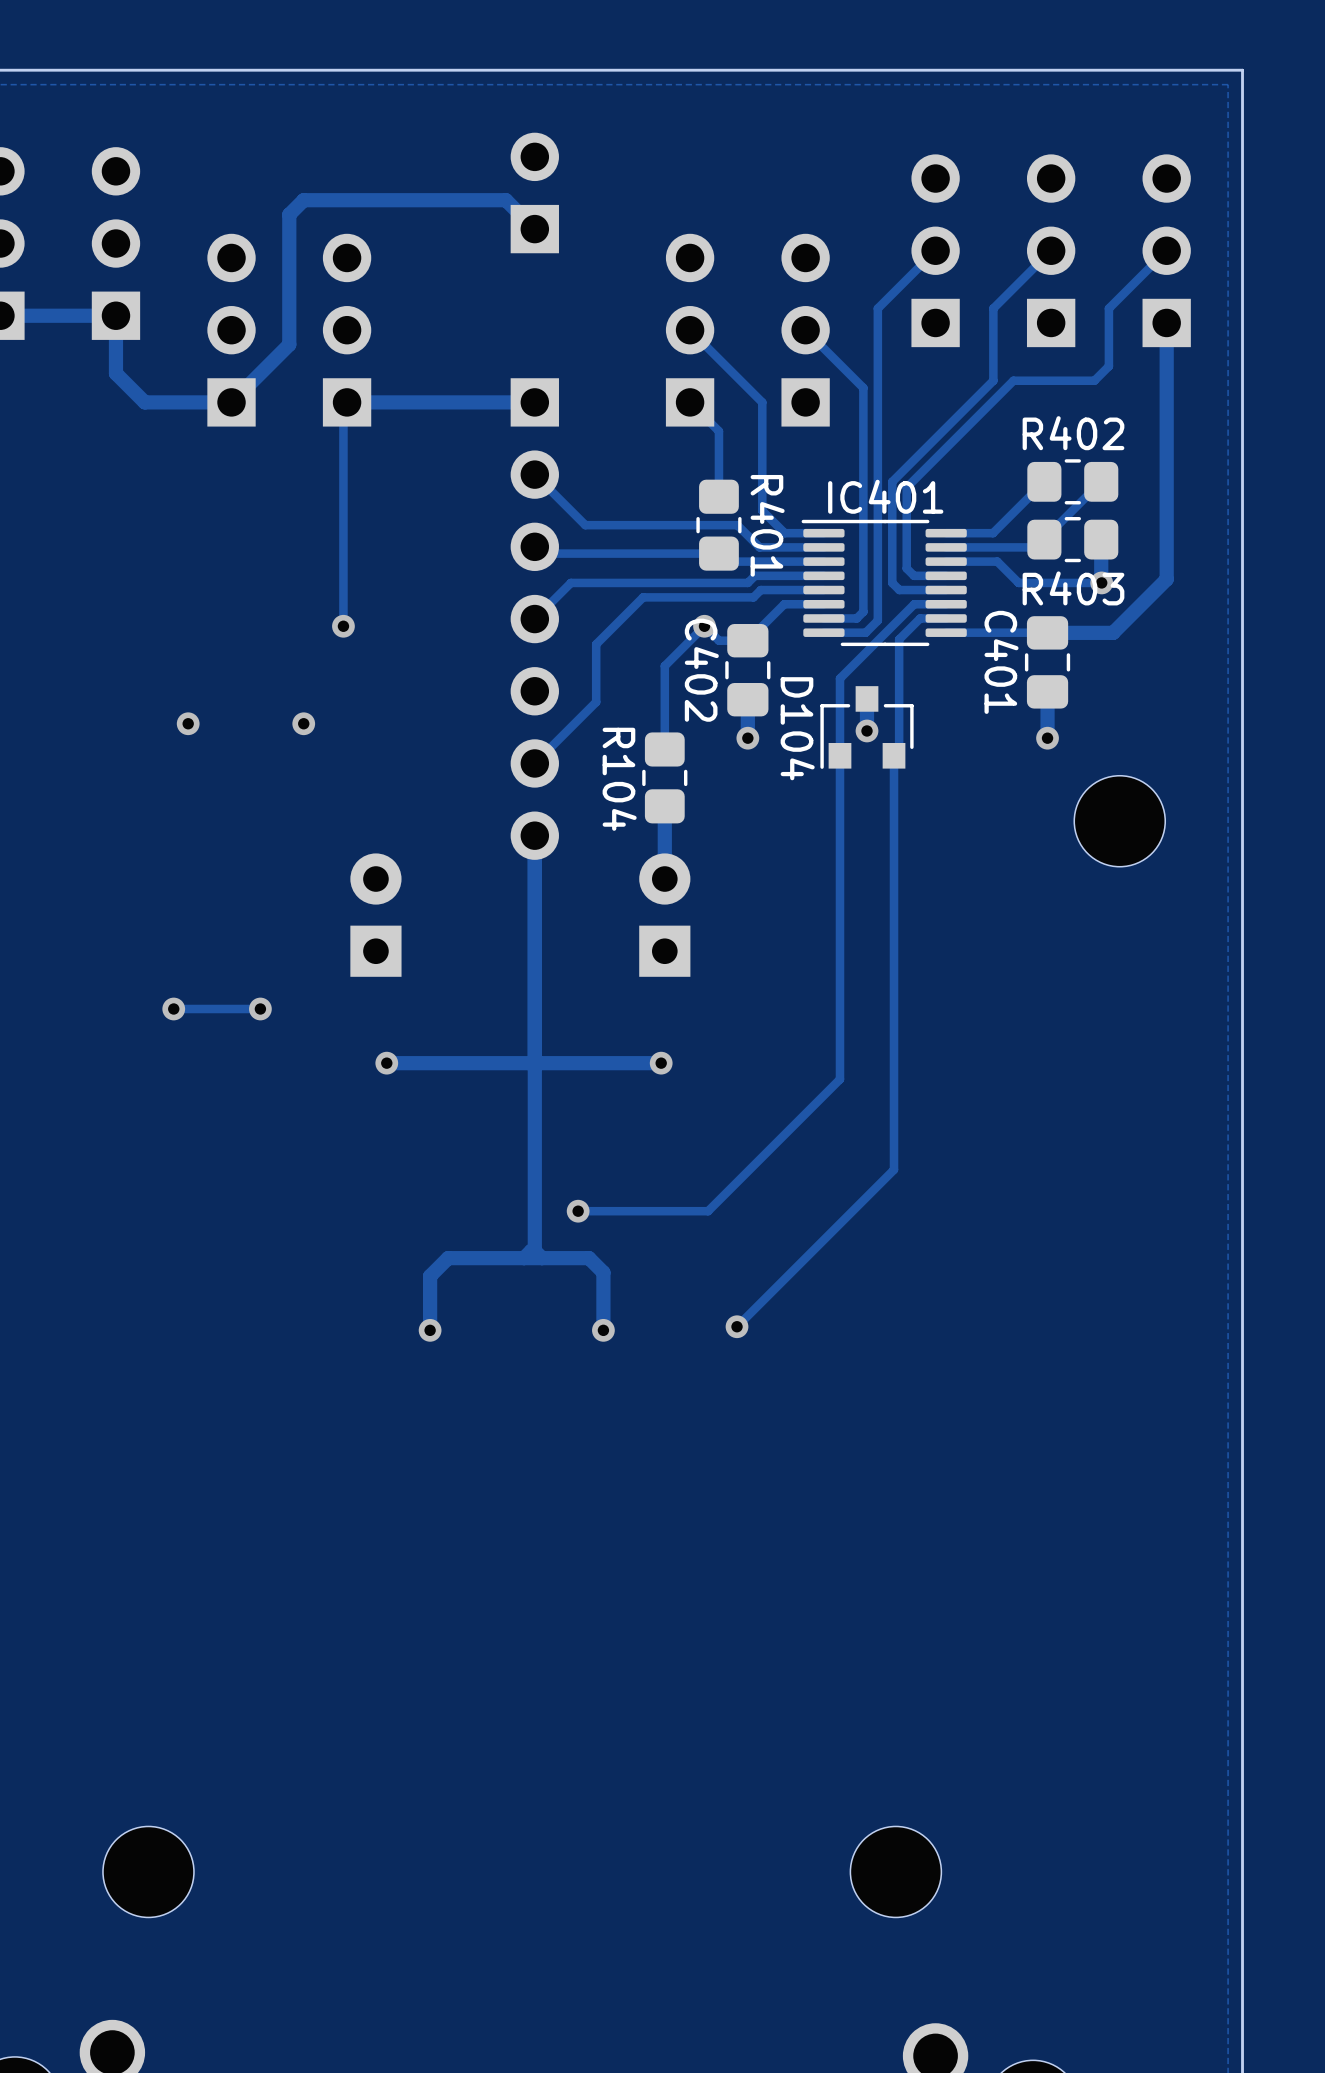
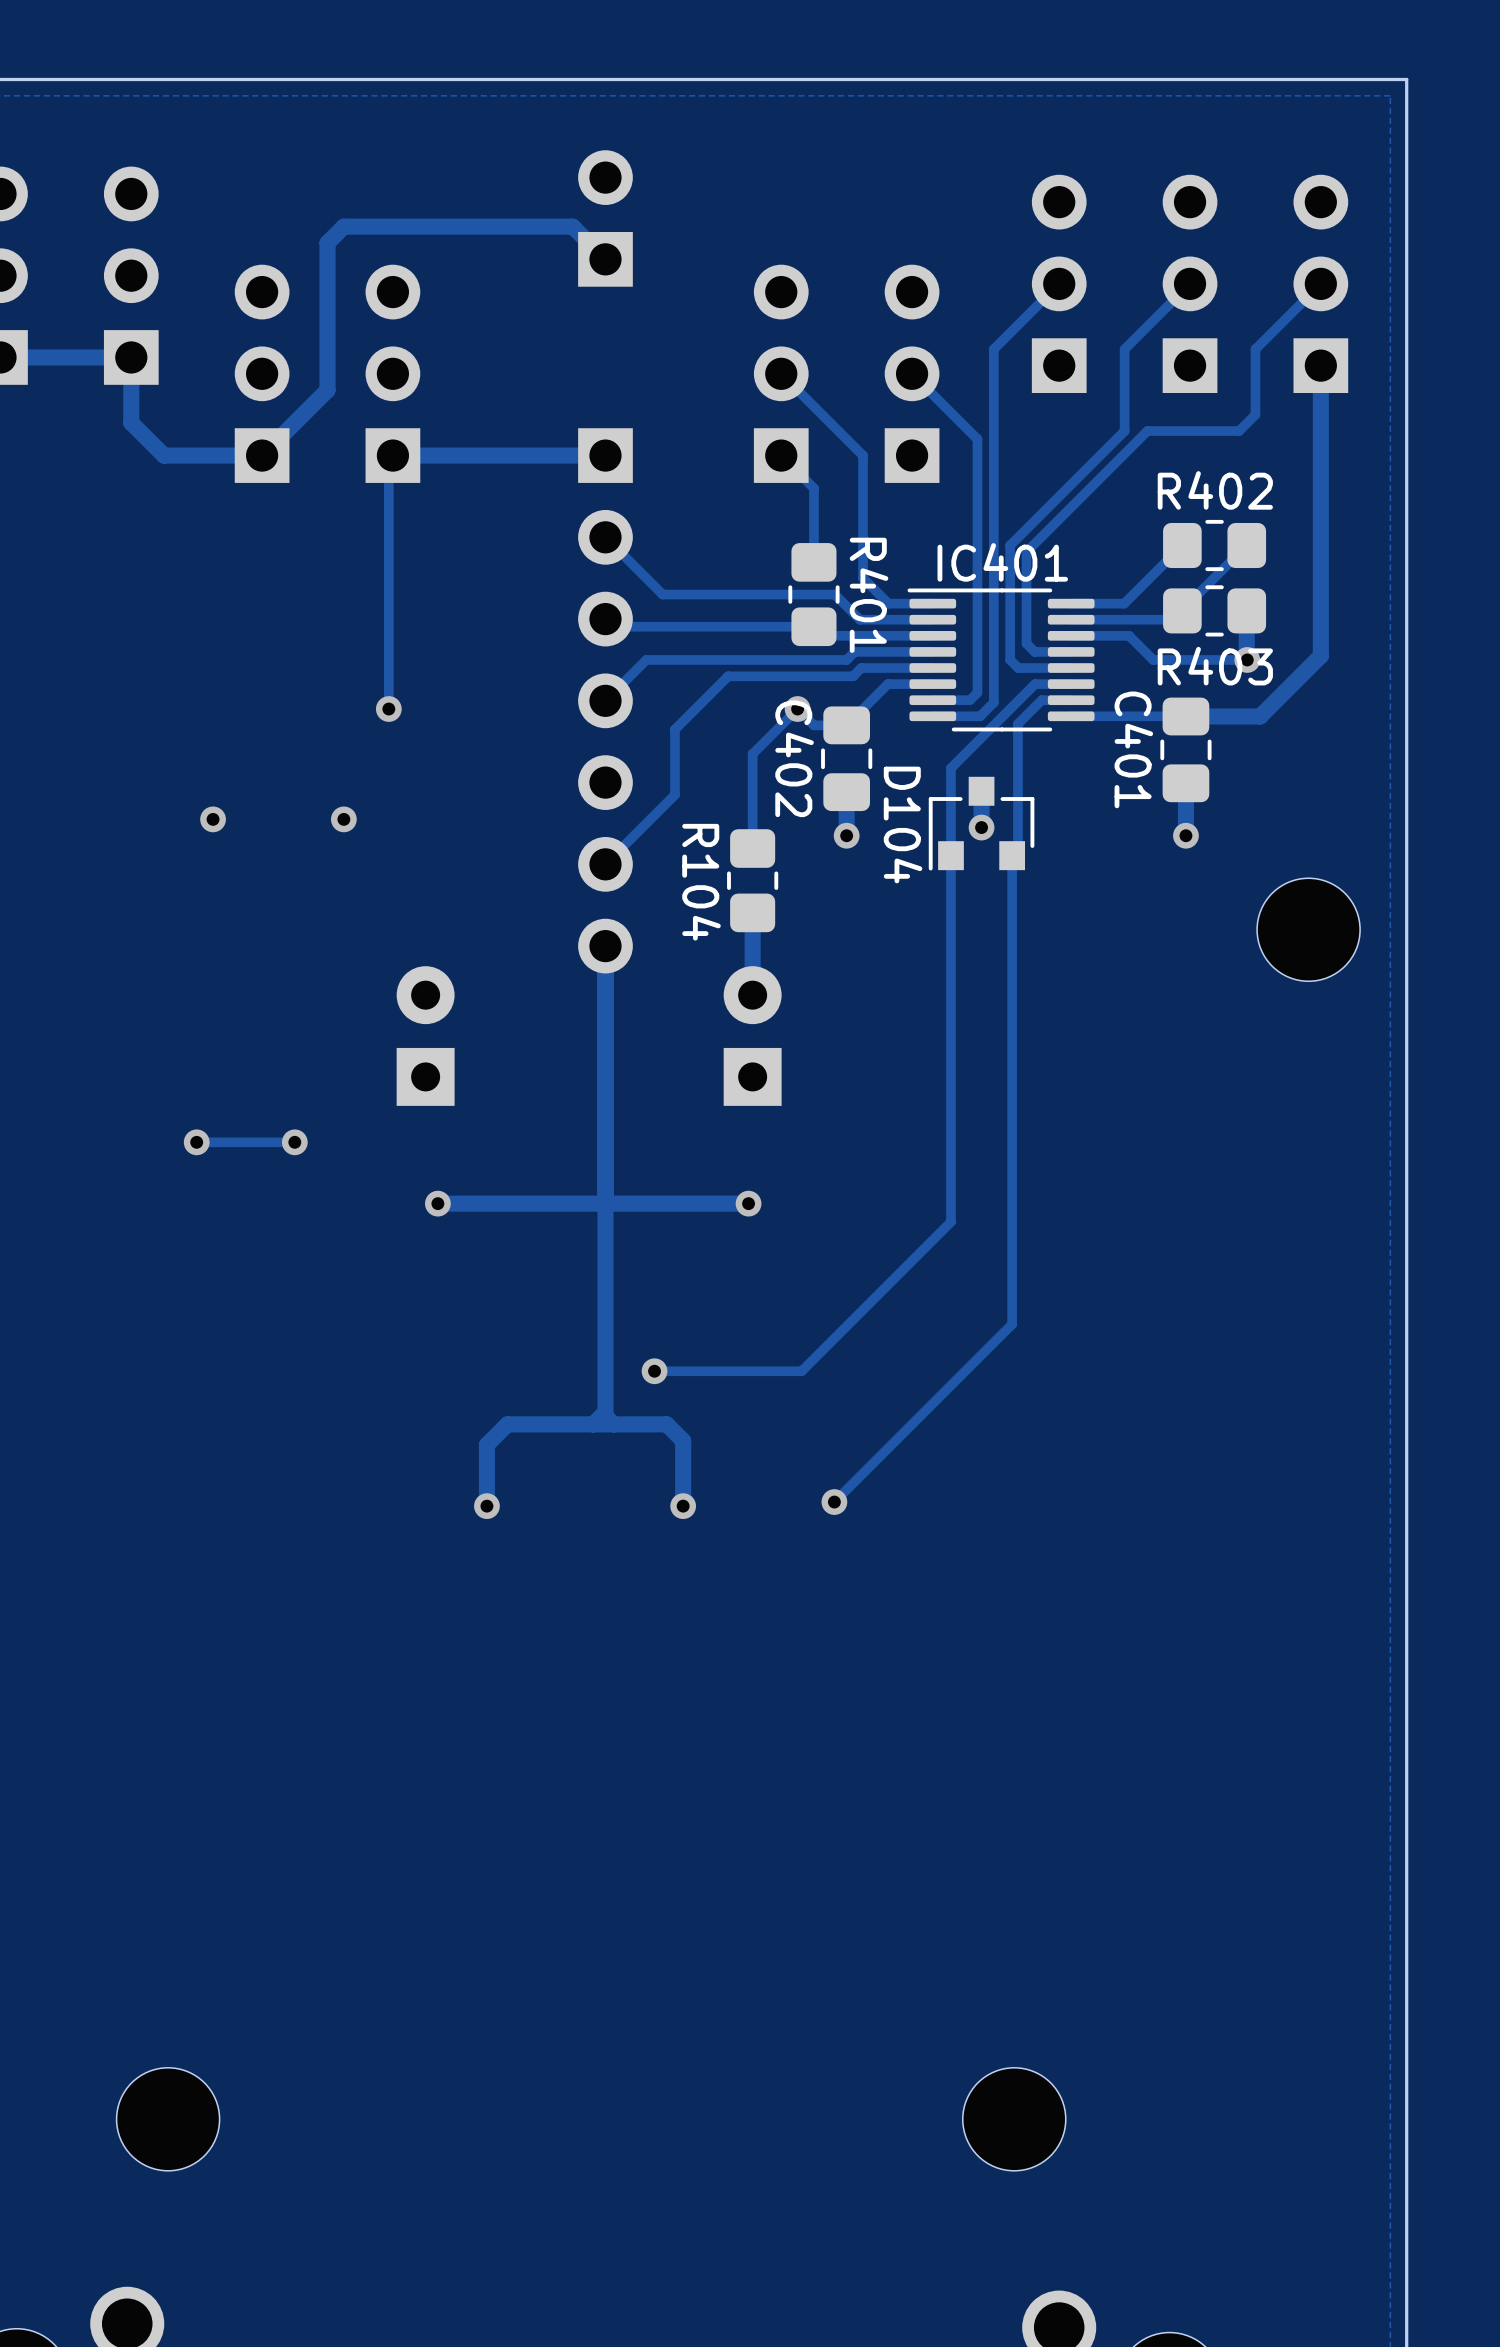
part position: (1119, 821) -> (1308, 929)

